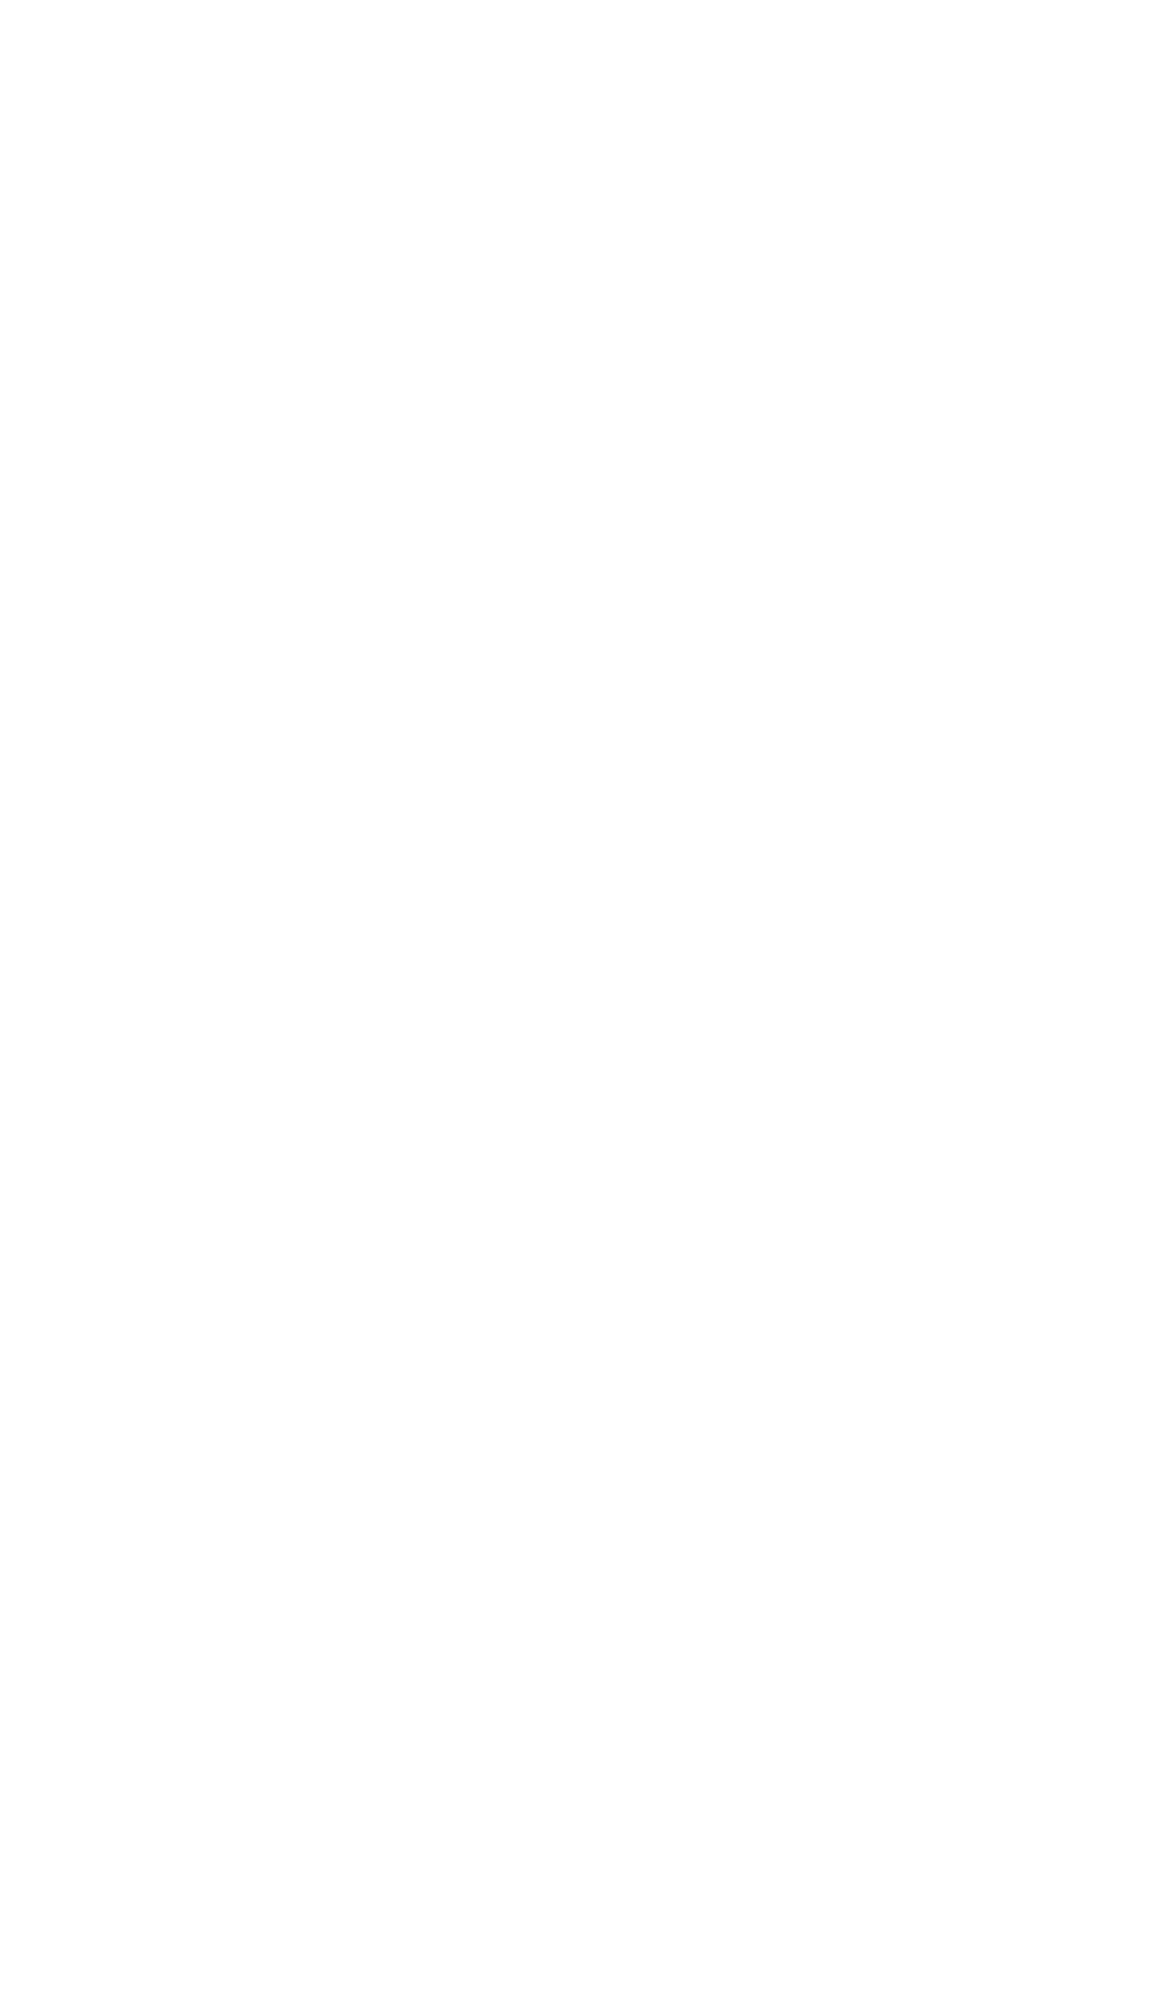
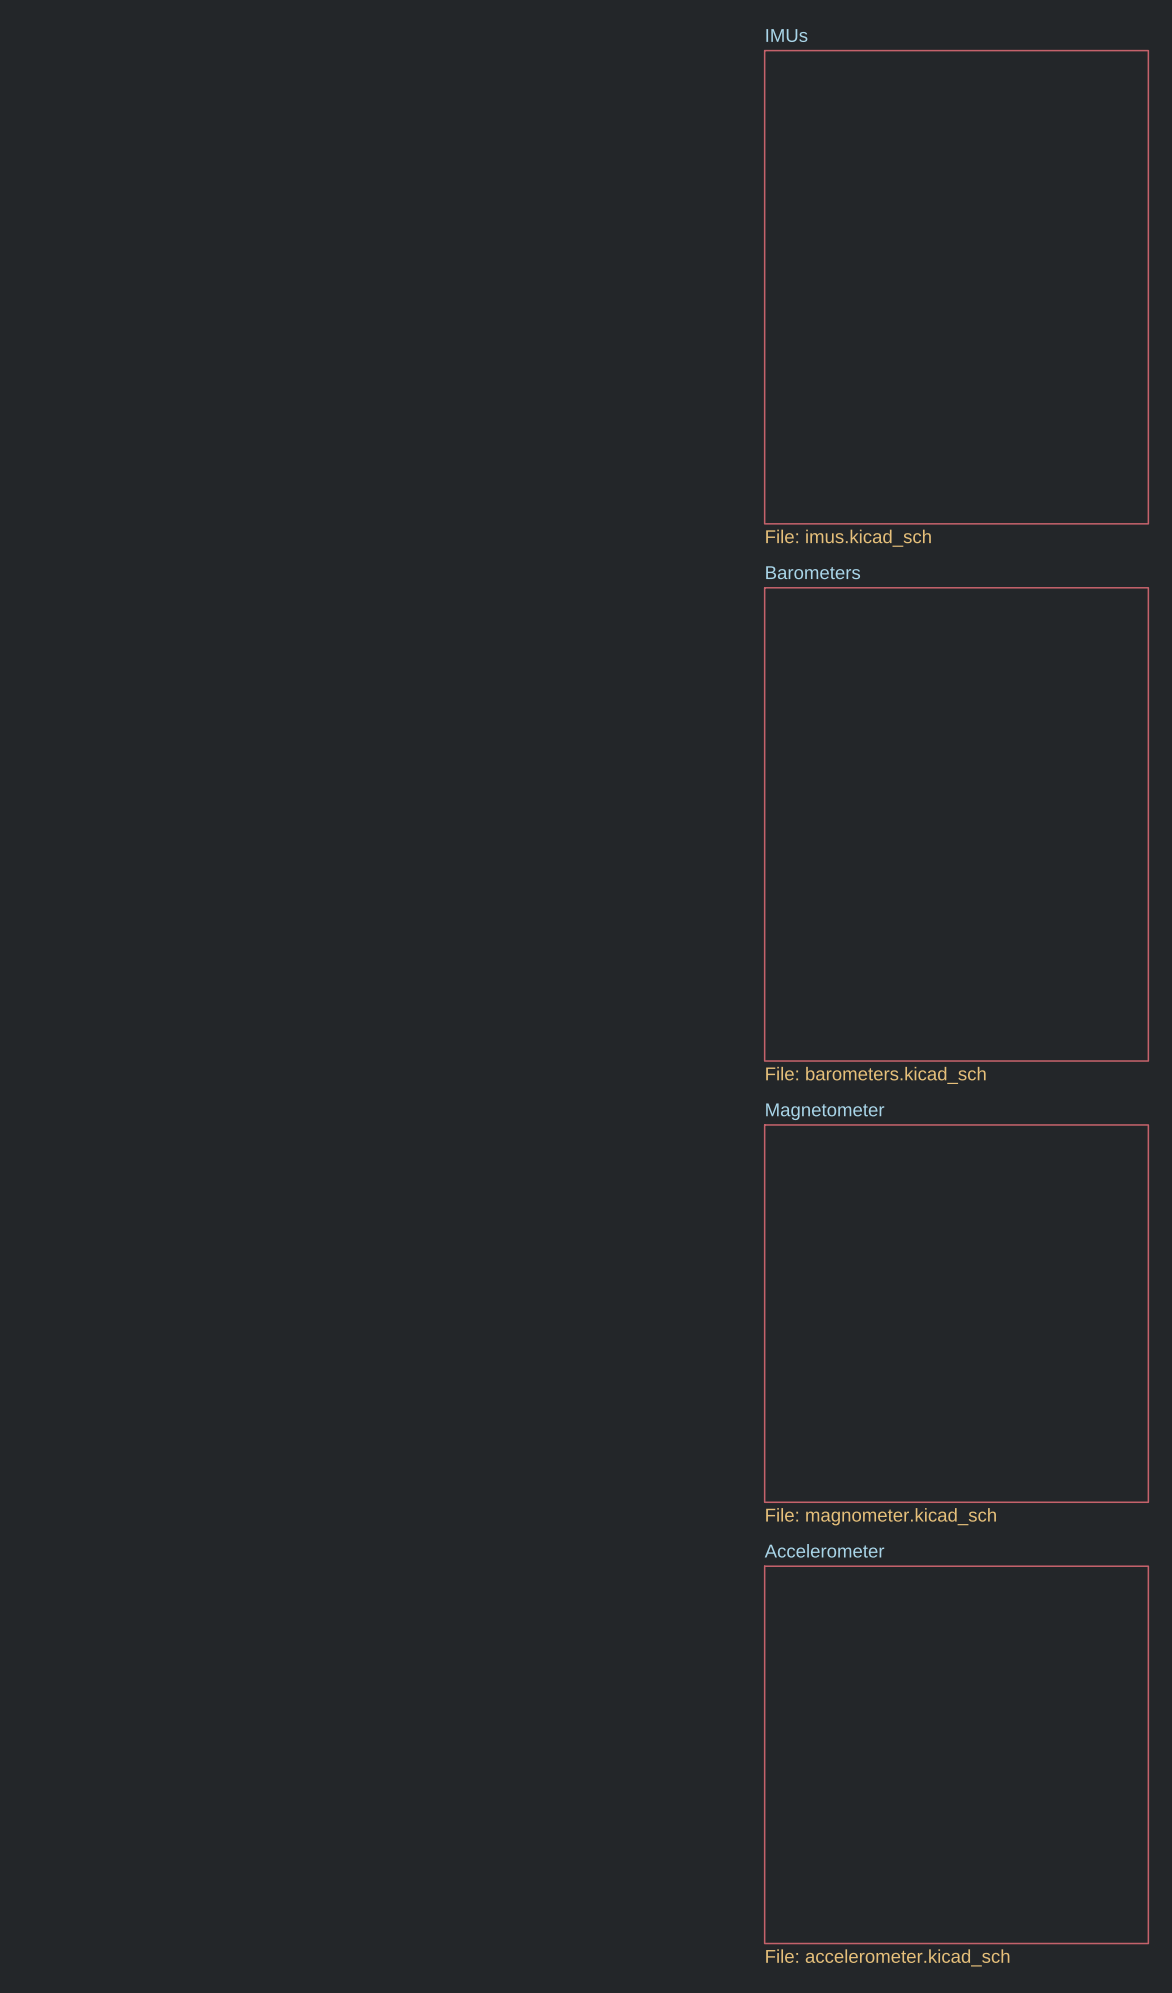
sheet IMUs: none -> File: imus.kicad_sch (956, 287)
sheet Barometers: none -> File: barometers.kicad_sch (956, 824)
sheet Magnetometer: none -> File: magnometer.kicad_sch (956, 1313)
sheet Accelerometer: none -> File: accelerometer.kicad_sch (956, 1754)

